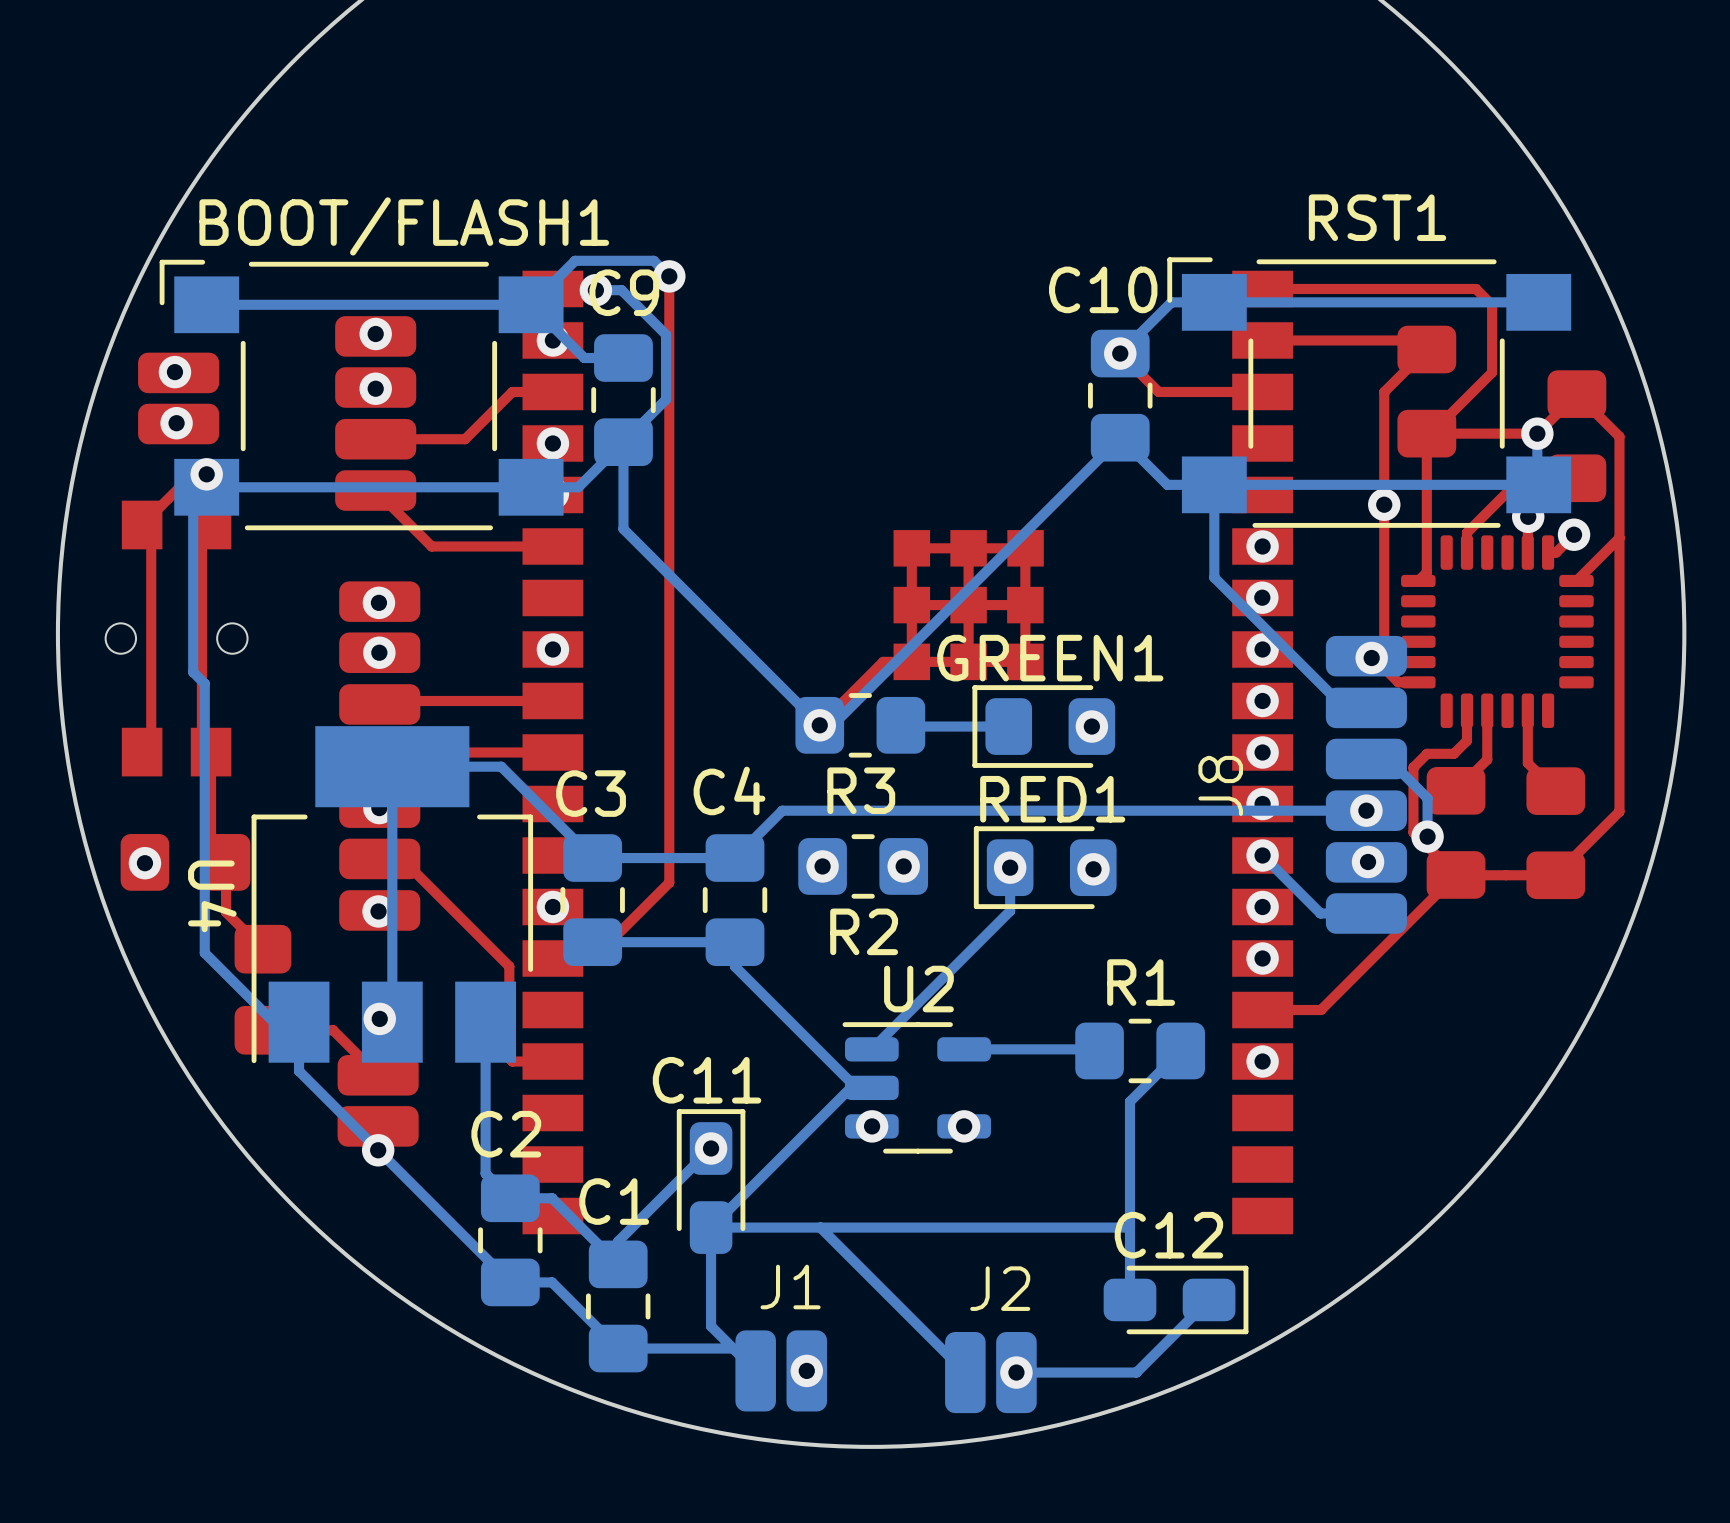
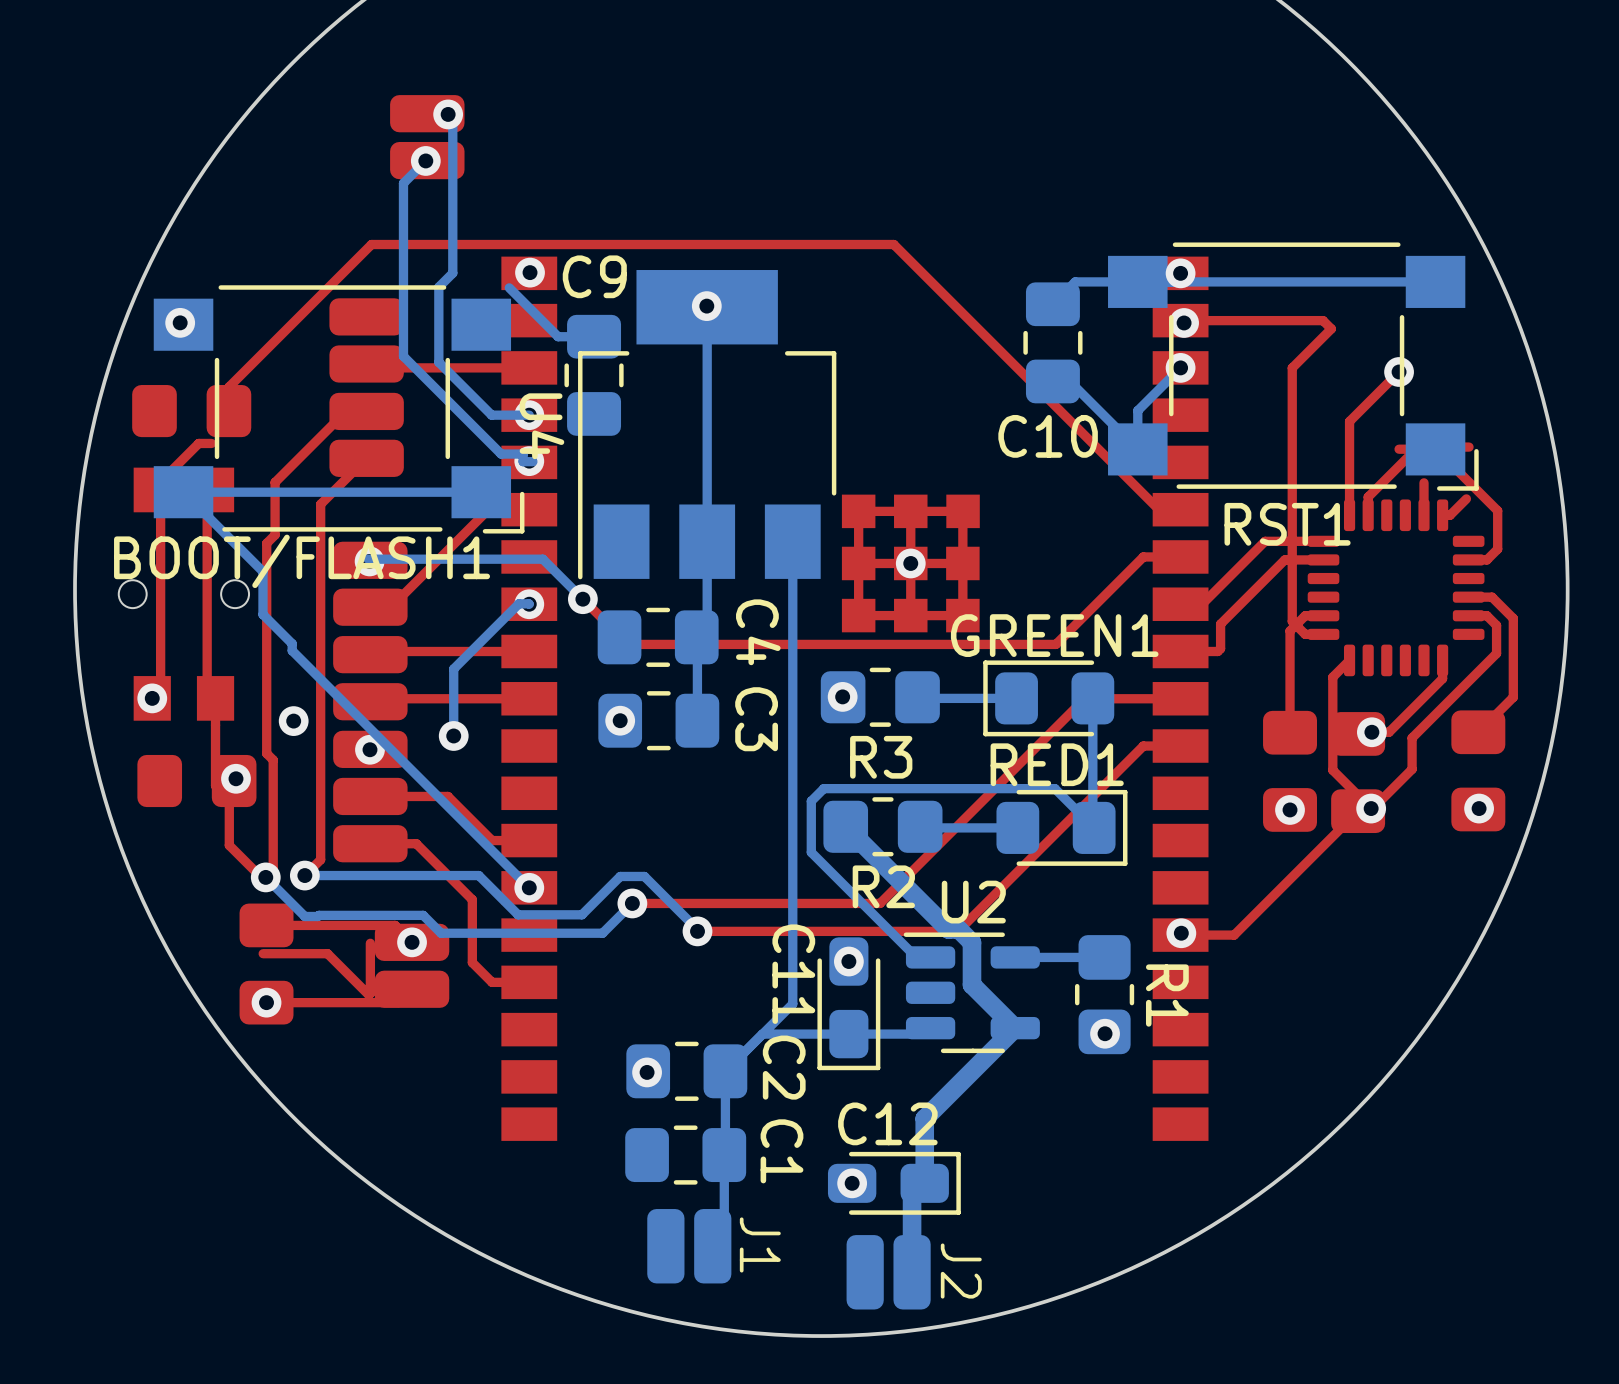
bottom track: none -> (448, 114) (452, 119) (452, 273) (438, 287) (438, 362) (491, 415) (529, 415)
via: none -> (448, 114)
part: none -> (427, 137)
bottom track: none -> (425, 160) (403, 183) (403, 356) (501, 454) (523, 454) (523, 461) (532, 461)
via: none -> (425, 160)
top track: (669, 276) (669, 882) (593, 958) (552, 958) -> none
bottom track: (669, 276) (653, 260) (575, 260) (531, 304) (206, 304) -> none
via: (669, 276) -> none
top track: (1262, 288) (1475, 288) (1492, 305) (1492, 372) (1430, 433) -> none
via: none -> (1180, 273)
C10 name position: C10 (1103, 289) -> C10 (1048, 436)
bottom track: (595, 290) (621, 290) (666, 334) (666, 399) (578, 487) (206, 487) (193, 500) (193, 672) (204, 683) (204, 953) (273, 1022) (299, 1022) (299, 1071) (510, 1282) (552, 1282) (618, 1348) (733, 1348) -> none
via position: (595, 290) -> (530, 272)
bottom track: none -> (1435, 281) (1075, 281) (1052, 304)
bottom track: (1538, 302) (1171, 302) (1120, 353) -> none
via: none -> (706, 306)
bottom track: none -> (707, 306) (707, 626) (696, 637) (697, 720)
via: (375, 333) -> none
via: (552, 340) -> none
via: none -> (1184, 322)
top track: (1120, 353) (1158, 391) (1262, 391) -> none
via: (1120, 353) -> none
via: (174, 372) -> none
via: (375, 388) -> none
top track: (512, 391) (465, 439) (375, 439) -> (492, 367) (370, 367) (366, 363)
bottom track: none -> (1180, 367) (1137, 410) (1137, 449) (1069, 381) (1052, 381)
via: none -> (1180, 367)
part: (1426, 391) -> none
RST1 rotation: 0° (1369, 392) -> 180° (1293, 366)
BOOT/FLASH1 rotation: 0° (361, 395) -> 180° (339, 409)
C10 position: (1120, 395) -> (1052, 342)
top track: none -> (1399, 371) (1349, 421) (1349, 515)
part: (178, 398) -> none
via: (176, 423) -> none
bottom track: (1537, 433) (1538, 484) (1167, 484) (1120, 437) (832, 725) (819, 725) (623, 529) (623, 442) -> none
via position: (1537, 433) -> (1399, 371)
part: (1576, 436) -> none
top track: none -> (228, 411) (228, 387) (371, 244) (893, 244) (1159, 509) (1180, 509)
top track: none -> (366, 411) (346, 411) (275, 482) (275, 535) (266, 543) (266, 753) (273, 760) (273, 869) (265, 877)
via position: (206, 474) -> (180, 322)
top track: none -> (1399, 449) (1436, 449) (1497, 510) (1497, 549) (1486, 559) (1468, 559)
bottom track: (1214, 484) (1214, 577) (1344, 707) (1366, 707) -> none
top track: (375, 490) (431, 546) (508, 546) -> (370, 607) (390, 607) (488, 509)
top track: none -> (366, 458) (320, 504) (320, 859) (304, 875)
via: (1384, 504) -> none
via: (1528, 516) -> none
bottom track: none -> (481, 492) (183, 492) (262, 571) (262, 614) (292, 643) (292, 650) (529, 887)
via: (1574, 534) -> none
top track: (1619, 537) (1576, 580) -> none
via: (1262, 546) -> none
top track: (1418, 580) (1426, 572) (1426, 433) (1537, 433) (1576, 394) (1619, 436) (1619, 811) (1555, 875) (1456, 875) (1413, 832) (1413, 767) (1427, 753) (1453, 753) (1466, 740) (1466, 710) -> (1323, 541) (1265, 541) (1202, 604) (1180, 604)
bottom track: none -> (792, 541) (792, 1003) (725, 1071) (724, 1234) (712, 1246)
top track: none -> (1180, 556) (1143, 556) (1055, 644) (628, 644) (582, 599)
via: (1262, 597) -> none
bottom track: none -> (368, 559) (542, 559) (582, 599)
top track: none -> (1323, 559) (1284, 559) (1220, 624) (1220, 648) (1217, 651) (1180, 651)
via: none -> (910, 563)
top track: none -> (1468, 597) (1492, 597) (1513, 618) (1513, 697) (1478, 732)
via: none -> (582, 599)
bottom track: none -> (528, 603) (518, 603) (453, 668) (453, 735)
via: (1262, 649) -> none
via: (379, 652) -> none
via: (1371, 658) -> none
top track: (911, 661) (883, 661) (819, 725) -> none
top track: none -> (1323, 615) (1305, 615) (1290, 631) (1290, 732)
top track: none -> (1468, 615) (1486, 615) (1496, 625) (1496, 653) (1412, 738) (1412, 769) (1371, 809)
via: (1262, 700) -> none
top track: none -> (1349, 660) (1332, 677) (1332, 770) (1371, 809)
top track: (1487, 710) (1487, 759) (1456, 790) -> none
top track: (1527, 710) (1527, 763) (1555, 791) -> none
top track: none -> (1442, 660) (1442, 678) (1389, 732) (1371, 732)
via position: (819, 725) -> (842, 696)
R3 position: (860, 725) -> (880, 697)
bottom track: (900, 725) (1008, 726) -> (917, 697) (1016, 698)
GREEN1 position: (1043, 726) -> (1048, 698)
via: (1091, 726) -> none
via: none -> (152, 698)
bottom track: none -> (1092, 698) (1092, 826)
top track: none -> (1180, 698) (1084, 698) (880, 903) (632, 903)
via: (1262, 752) -> none
bottom track: (1366, 758) (1388, 758) (1427, 798) (1427, 836) -> none
via: none -> (293, 721)
via: none -> (620, 720)
J8: (1366, 784) -> none
via: none -> (1371, 732)
via: none -> (453, 735)
top track: none -> (1180, 746) (1143, 746) (958, 931) (697, 931)
via: (1262, 804) -> none
bottom track: (1366, 810) (782, 810) (735, 858) (592, 858) (501, 766) (392, 766) (392, 1022) (383, 1022) (379, 1018) -> none
via: (1366, 810) -> none
part: none -> (1290, 771)
part position: (1555, 833) -> (1478, 770)
via: (1427, 836) -> none
via: none -> (236, 778)
bottom track: (1262, 855) (1320, 913) (1366, 913) -> none
via: (1262, 855) -> none
top track: (401, 858) (509, 966) (509, 1058) -> (370, 843) (416, 843) (472, 899) (472, 962) (489, 979)
top track: none -> (390, 796) (447, 796) (492, 840) (529, 840)
via position: (1368, 861) -> (1290, 809)
part position: (185, 862) -> (196, 781)
via: (144, 863) -> none
via: (822, 866) -> none
R2 position: (863, 866) -> (882, 826)
via: (903, 866) -> none
bottom track: (1010, 867) (1010, 911) (871, 1049) -> none
via: (1010, 867) -> none
RED1 rotation: 0° (1045, 867) -> 180° (1061, 827)
RED1 position: (1045, 867) -> (1061, 827)
via: (1093, 869) -> none
via: none -> (1371, 808)
via: none -> (1479, 808)
bottom track: none -> (845, 826) (948, 929) (958, 929) (971, 942) (971, 984) (1015, 1028) (924, 1118) (924, 1183) (912, 1195) (912, 1272)
bottom track: none -> (920, 826) (1017, 827)
bottom track: none -> (1094, 827) (1054, 788) (823, 788) (811, 801) (811, 852) (916, 957) (930, 957)
U4 position: (392, 894) -> (707, 424)
C3 rotation: 0° (592, 900) -> 90° clockwise (658, 720)
C3 position: (592, 900) -> (658, 720)
C4 rotation: 0° (735, 900) -> 90° clockwise (658, 637)
C4 position: (735, 900) -> (658, 637)
via: (552, 907) -> none
via: (1262, 907) -> none
via: (378, 911) -> none
bottom track: (592, 942) (735, 942) (735, 966) (856, 1087) -> none
bottom track: none -> (304, 875) (478, 875) (518, 914) (581, 914) (620, 876) (644, 876) (697, 931)
via: none -> (304, 875)
bottom track: none -> (265, 877) (304, 916) (423, 915) (441, 933) (602, 933) (632, 903)
via: none -> (265, 877)
via: none -> (529, 887)
via: (1262, 958) -> none
via: none -> (632, 903)
part rotation: 0° (262, 989) -> 90° clockwise (191, 411)
part position: (262, 989) -> (191, 411)
top track: none -> (266, 925) (395, 925) (412, 942)
via: none -> (697, 931)
via: none -> (1181, 933)
via position: (379, 1018) -> (412, 942)
bottom track: (485, 1022) (485, 1173) (510, 1198) (552, 1198) (618, 1264) (618, 1241) (711, 1148) -> none
bottom track: none -> (1104, 957) (1015, 957)
via: none -> (848, 961)
part: none -> (266, 964)
bottom track: (964, 1049) (1097, 1049) (1099, 1050) -> none
R1 rotation: 0° (1140, 1050) -> 90° clockwise (1104, 994)
bottom track: (1180, 1050) (1129, 1101) (1129, 1299) -> none
via: (1262, 1061) -> none
top track: none -> (412, 989) (398, 1002) (266, 1002)
C11 name position: C11 (707, 1080) -> C11 (793, 974)
via: none -> (266, 1002)
bottom track: (871, 1087) (850, 1087) (711, 1227) -> none
U2 position: (916, 1087) -> (971, 992)
part position: (378, 1100) -> (412, 965)
bottom track: none -> (930, 1028) (924, 1034) (762, 1034)
via: none -> (1105, 1033)
via: (872, 1126) -> none
via: (964, 1126) -> none
via position: (711, 1148) -> (647, 1072)
via: (378, 1150) -> none
C11 rotation: 0° (711, 1181) -> 180° (848, 1003)
C11 position: (711, 1181) -> (848, 1003)
bottom track: (711, 1227) (1129, 1228) -> none
bottom track: (711, 1227) (711, 1326) (755, 1370) -> none
bottom track: (820, 1227) (965, 1372) -> none
C2 rotation: 0° (510, 1240) -> 90° clockwise (686, 1071)
C2 position: (510, 1240) -> (686, 1071)
via: none -> (852, 1183)
J1 name rotation: 0° (790, 1287) -> 90° clockwise (760, 1244)
J2 name rotation: 0° (1000, 1288) -> 90° clockwise (961, 1271)
C12 position: (1176, 1299) -> (894, 1183)
bottom track: (1209, 1299) (1136, 1372) (1016, 1372) -> none
C1 rotation: 0° (618, 1306) -> 90° clockwise (685, 1155)
C1 position: (618, 1306) -> (685, 1155)
J1 position: (781, 1370) -> (689, 1246)
via: (806, 1370) -> none
J2 position: (990, 1372) -> (888, 1272)
via: (1016, 1372) -> none

